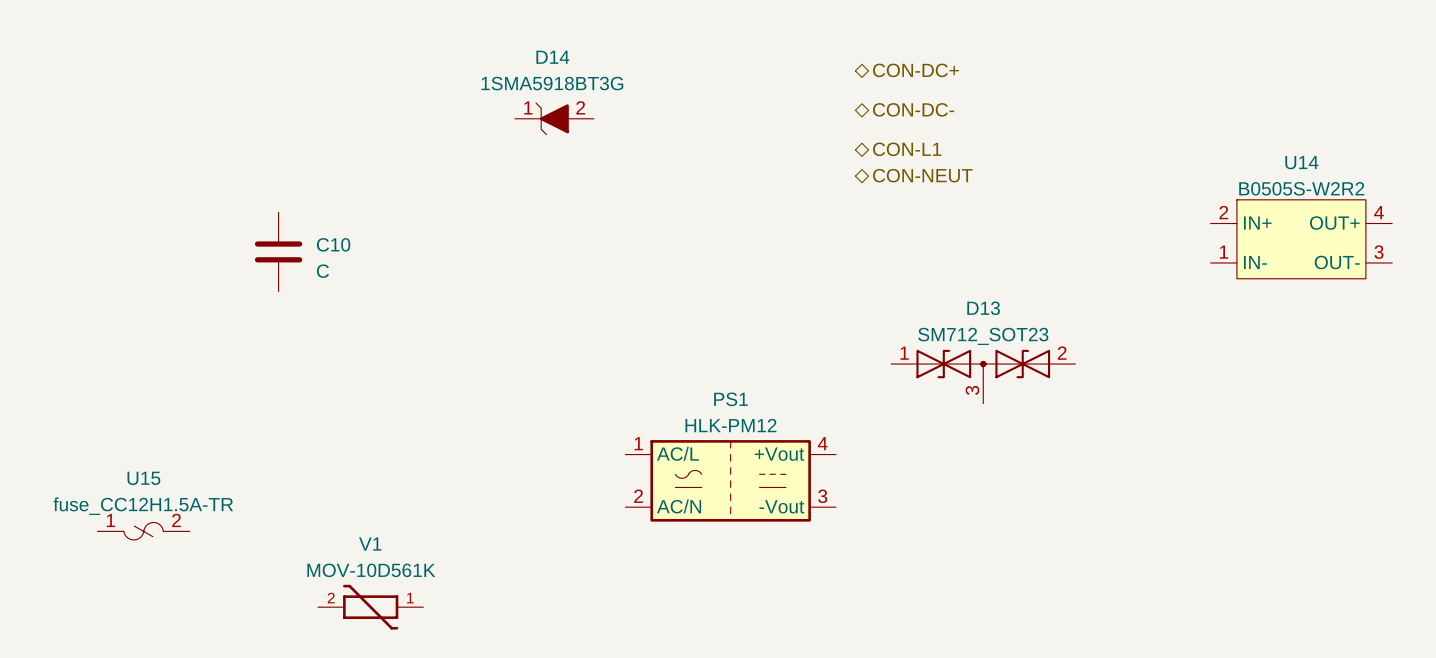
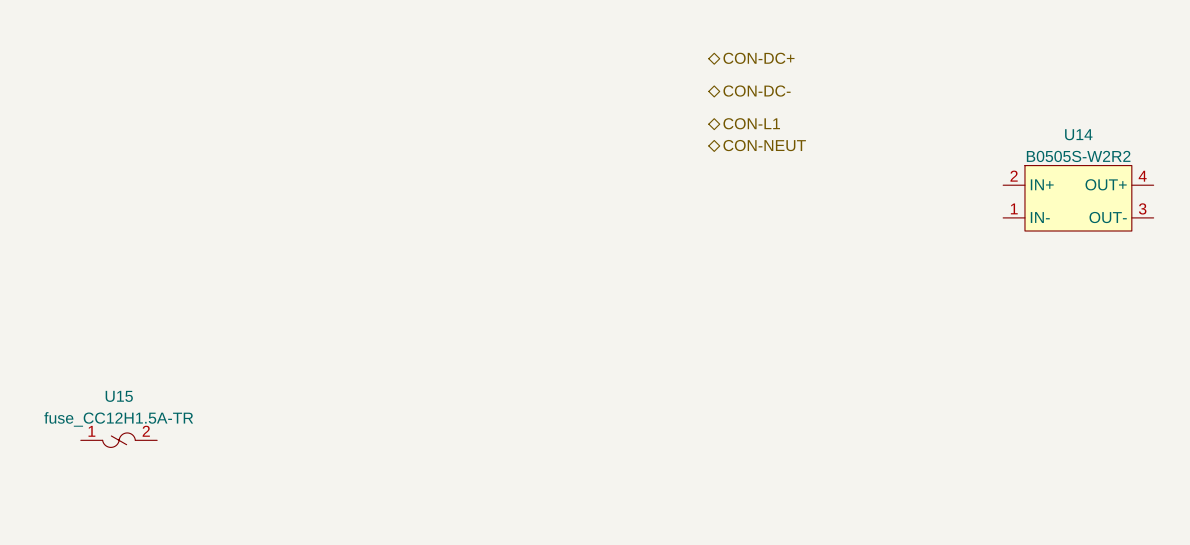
D14: 1SMA5918BT3G (554, 118) -> none
C10: C (278, 251) -> none
D13: SM712_SOT23 (983, 376) -> none
PS1: HLK-PM12 (730, 480) -> none
V1: MOV-10D561K (370, 607) -> none

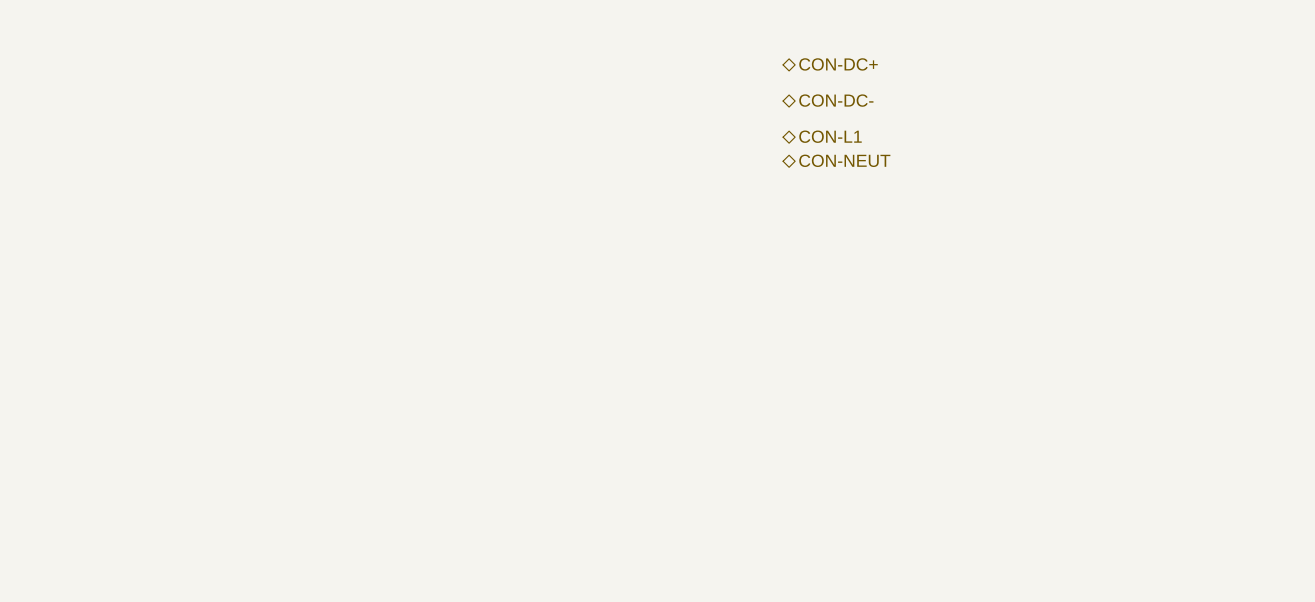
U14: B0505S-W2R2 (1078, 198) -> none
U15: fuse_CC12H1.5A-TR (118, 440) -> none

